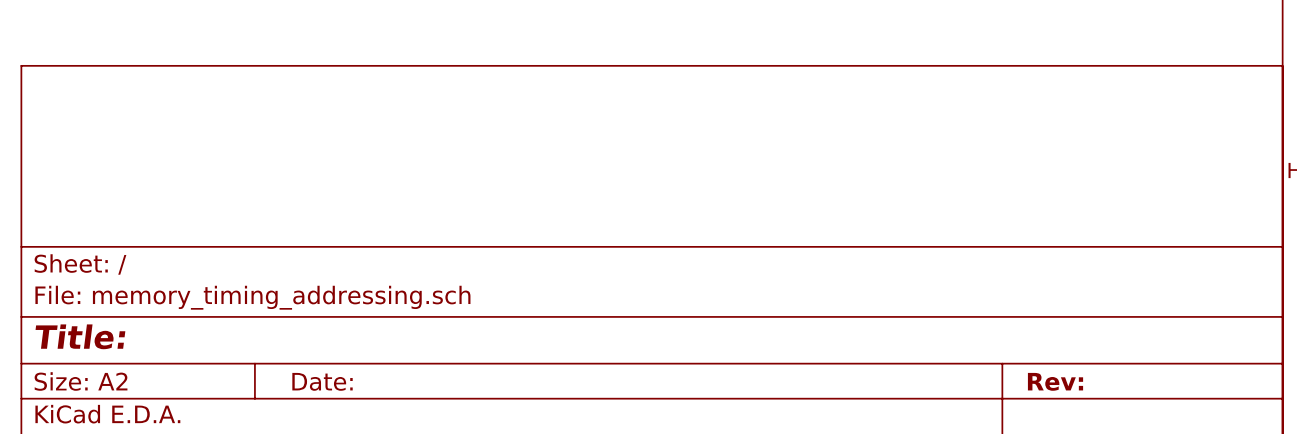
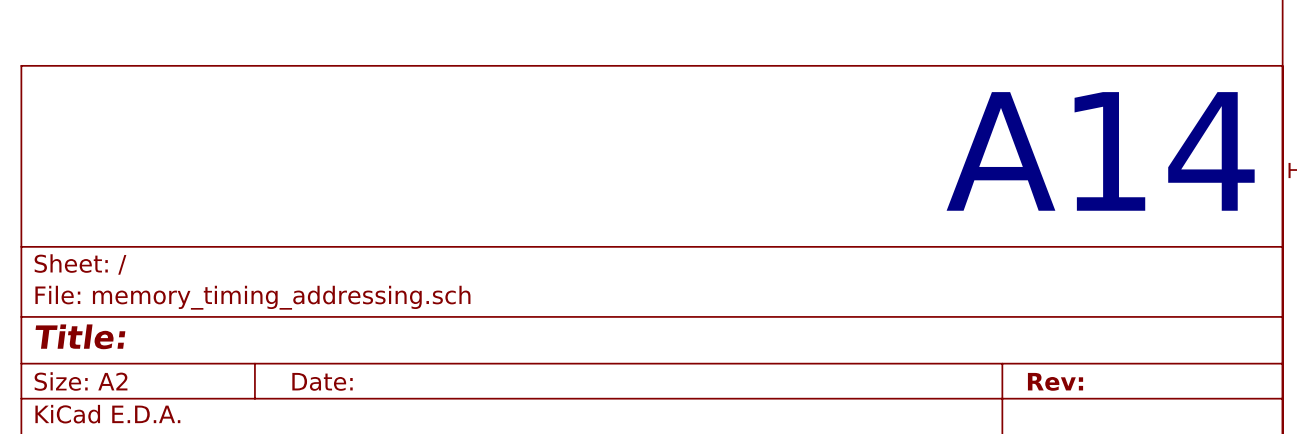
text: none -> A14 (1100, 151)

